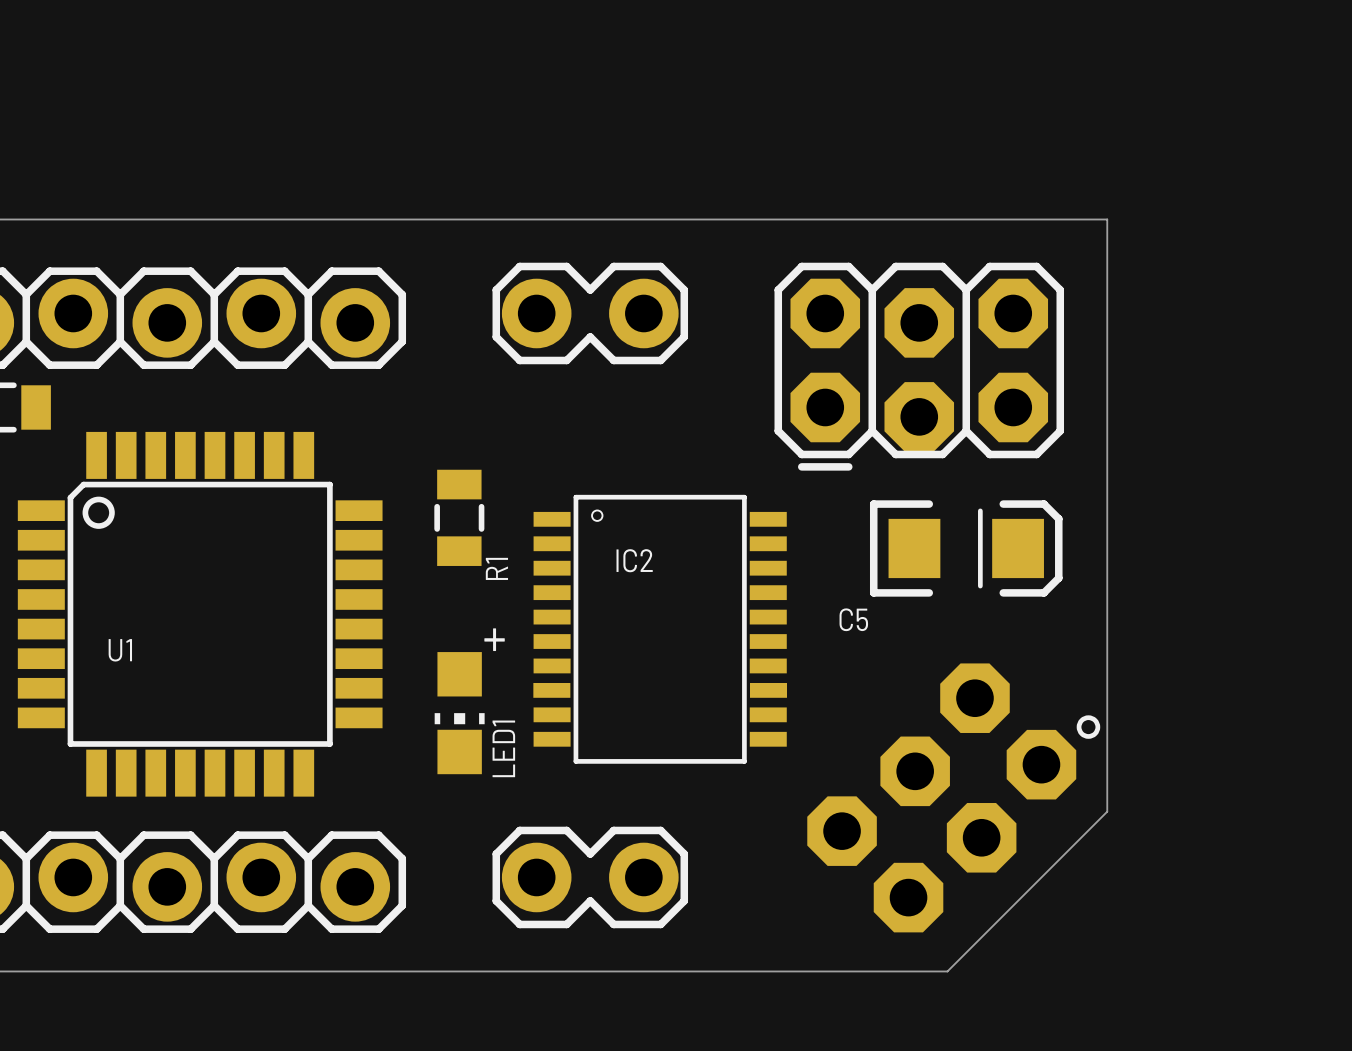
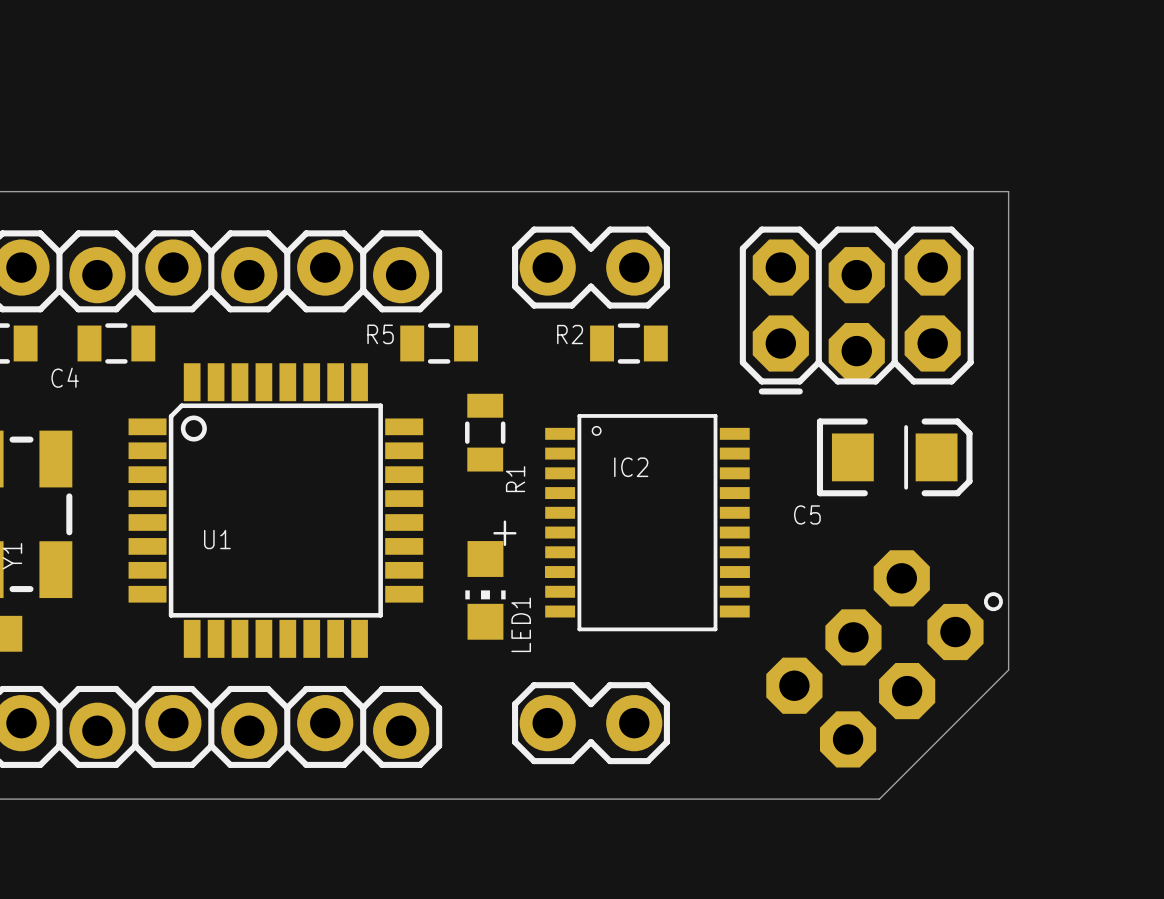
R5: none -> (439, 343)
R2: none -> (628, 343)

